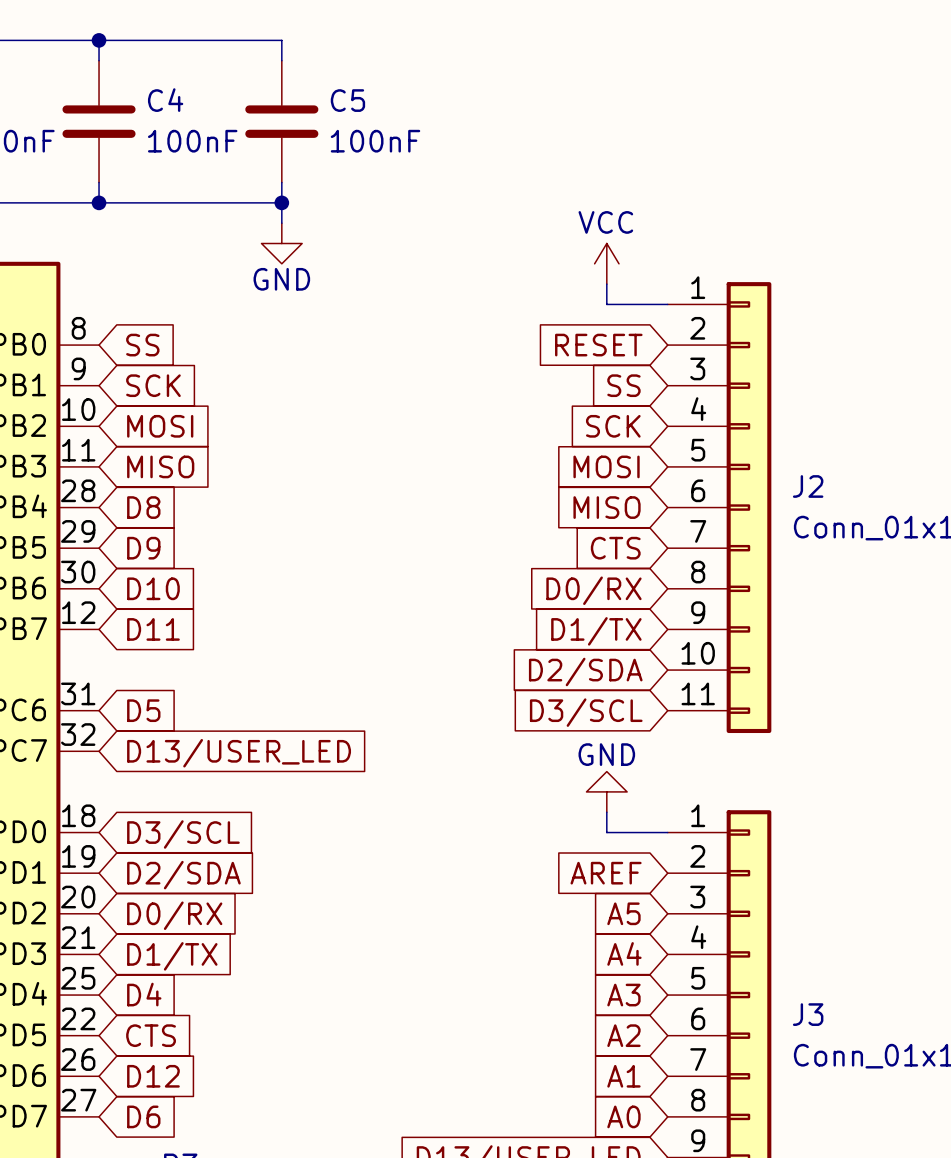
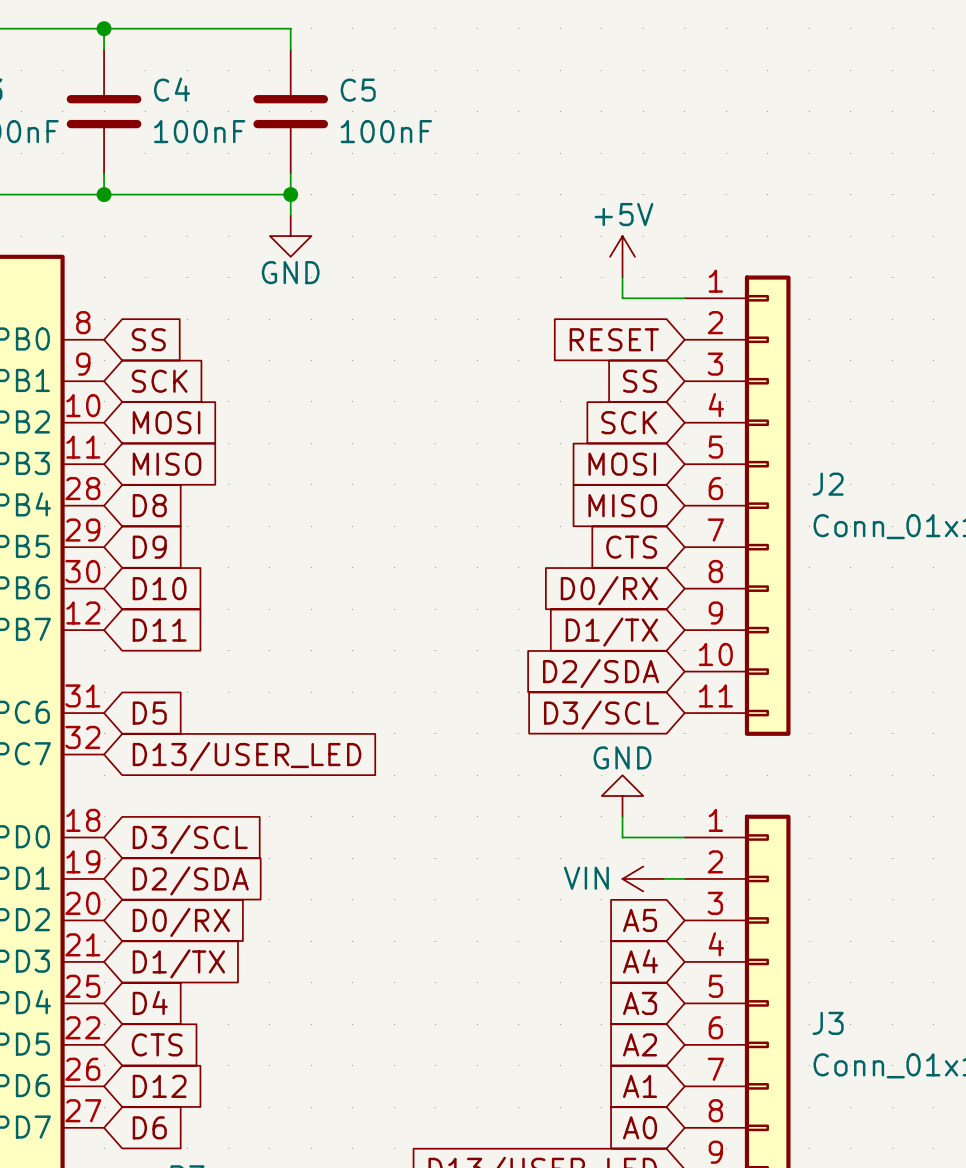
power symbol: VCC (606, 263) -> +5V (622, 256)
global label: AREF (606, 873) -> none
power symbol: none -> VIN (643, 878)
wire: none -> (664, 878) (684, 878)

